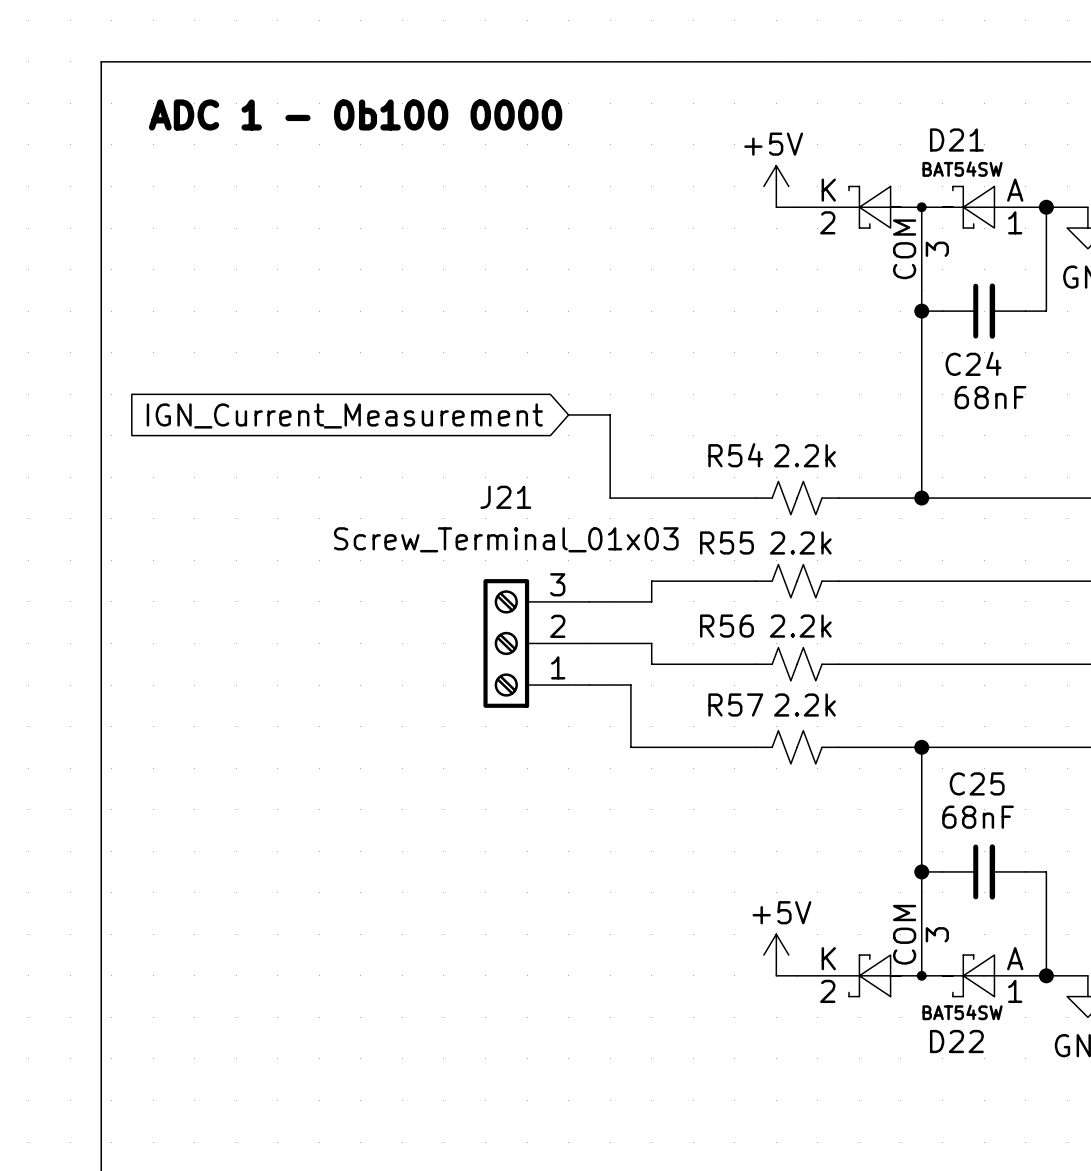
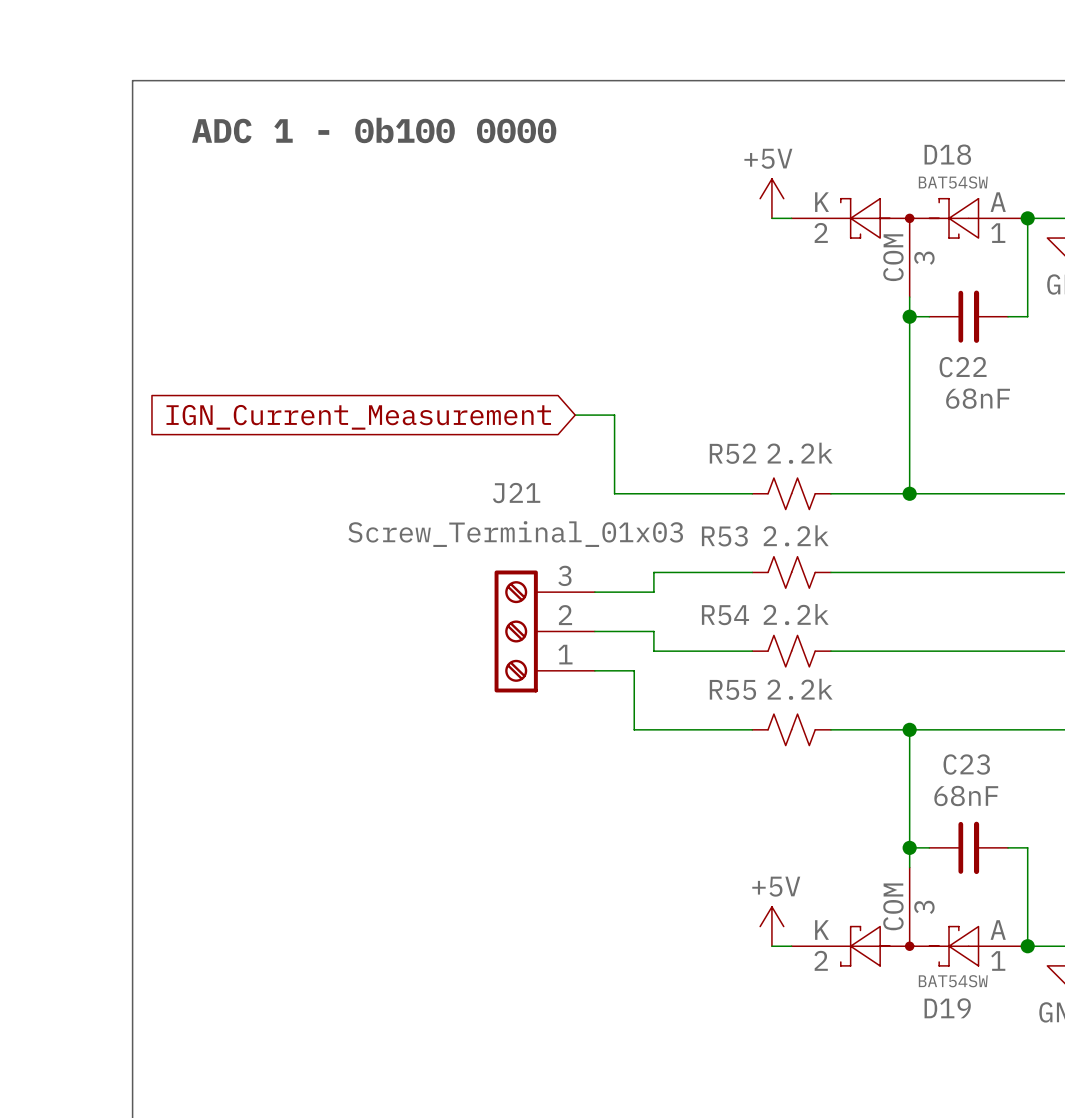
D21 name: D21 (956, 140) -> D18 (947, 154)
C24 name: C24 (973, 363) -> C22 (963, 367)
R54 name: R54 (735, 455) -> R52 (732, 453)
R55 name: R55 (726, 542) -> R53 (724, 536)
R56 name: R56 (726, 626) -> R54 (725, 615)
R57 name: R57 (735, 705) -> R55 (732, 689)
C25 name: C25 (977, 783) -> C23 (966, 764)
D22 name: D22 (956, 1041) -> D19 (947, 1008)

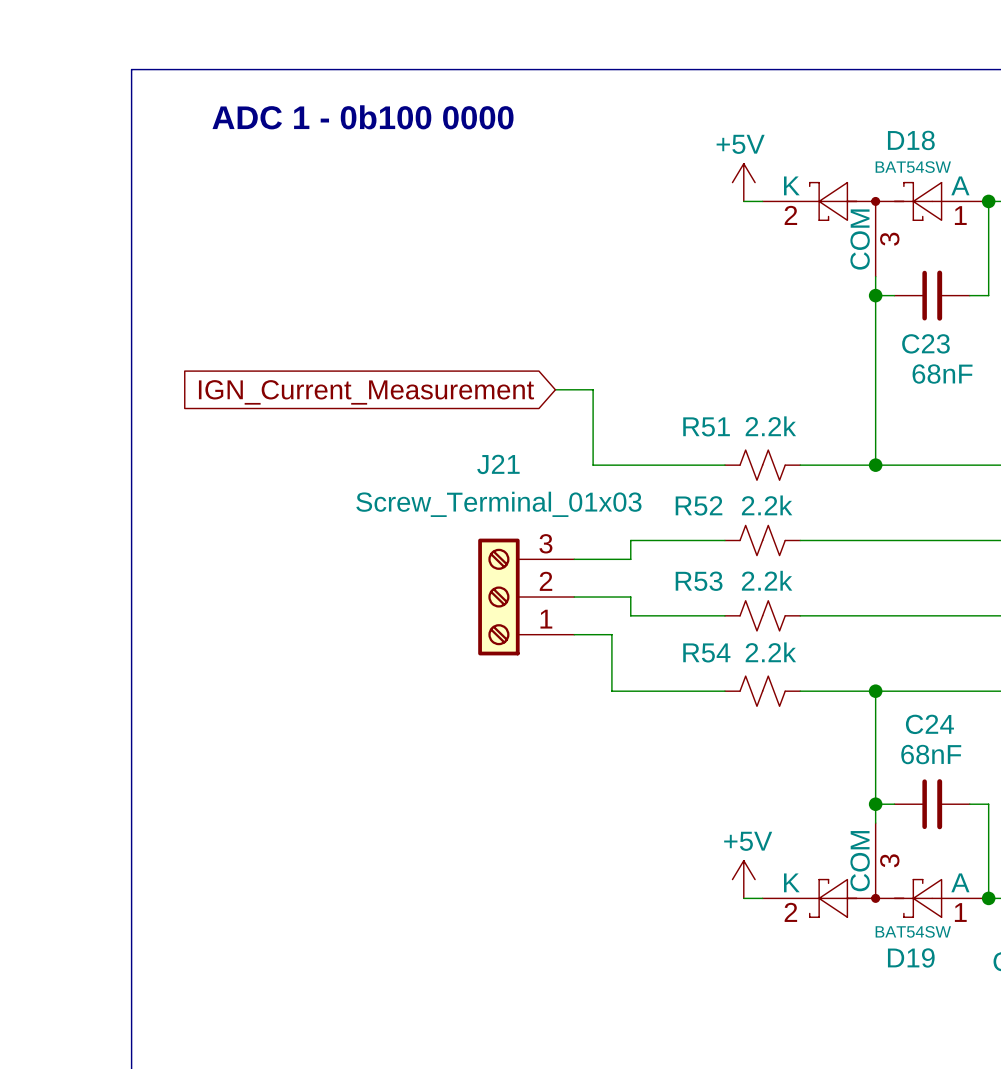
C22 name: C22 (963, 367) -> C23 (925, 343)
R52 name: R52 (732, 453) -> R51 (706, 426)
R53 name: R53 (724, 536) -> R52 (699, 505)
R54 name: R54 (725, 615) -> R53 (699, 581)
R55 name: R55 (732, 689) -> R54 (706, 652)
C23 name: C23 (966, 764) -> C24 (929, 724)

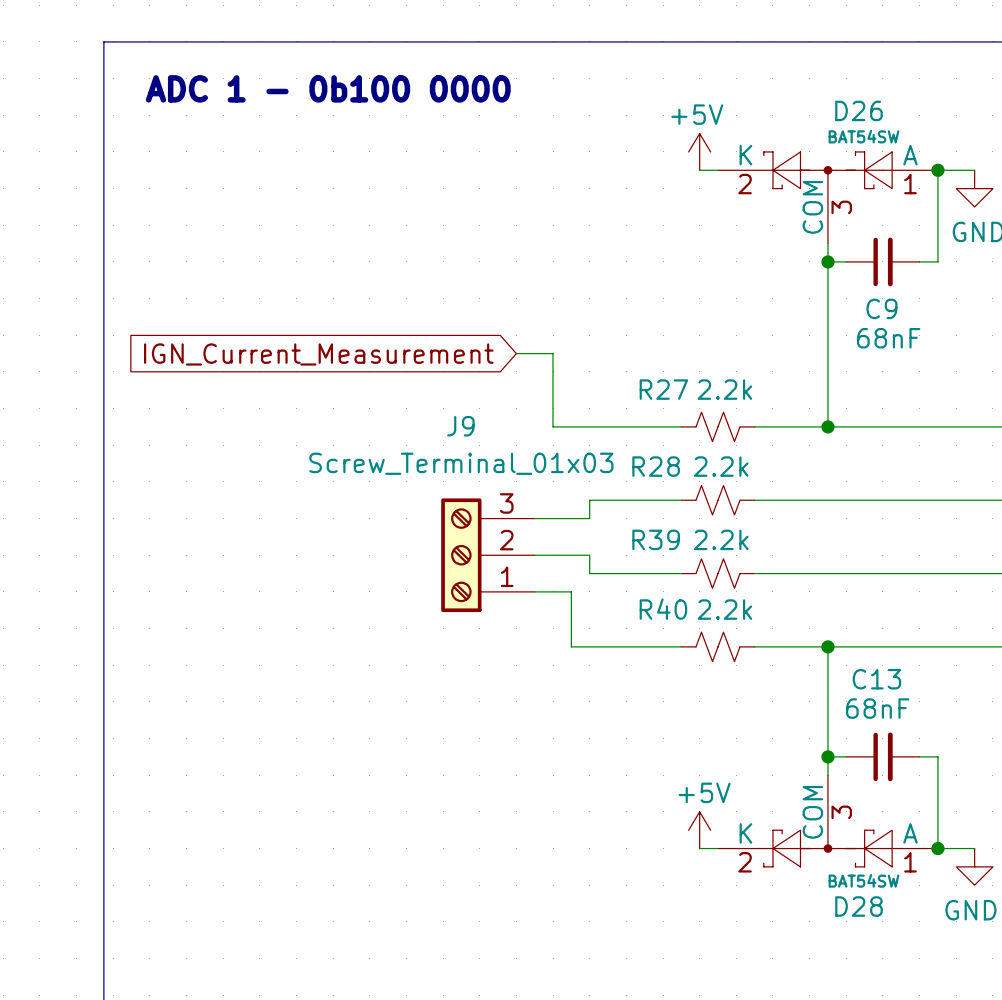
D18 name: D18 (911, 140) -> D26 (859, 110)
C23 name: C23 (925, 343) -> C9 (881, 308)
R51 name: R51 (706, 426) -> R27 (663, 389)
J21 name: J21 (498, 464) -> J9 (460, 426)
R52 name: R52 (699, 505) -> R28 (656, 466)
R53 name: R53 (699, 581) -> R39 (656, 539)
R54 name: R54 (706, 652) -> R40 (663, 609)
C24 name: C24 (929, 724) -> C13 (876, 679)
D19 name: D19 (911, 957) -> D28 (859, 906)

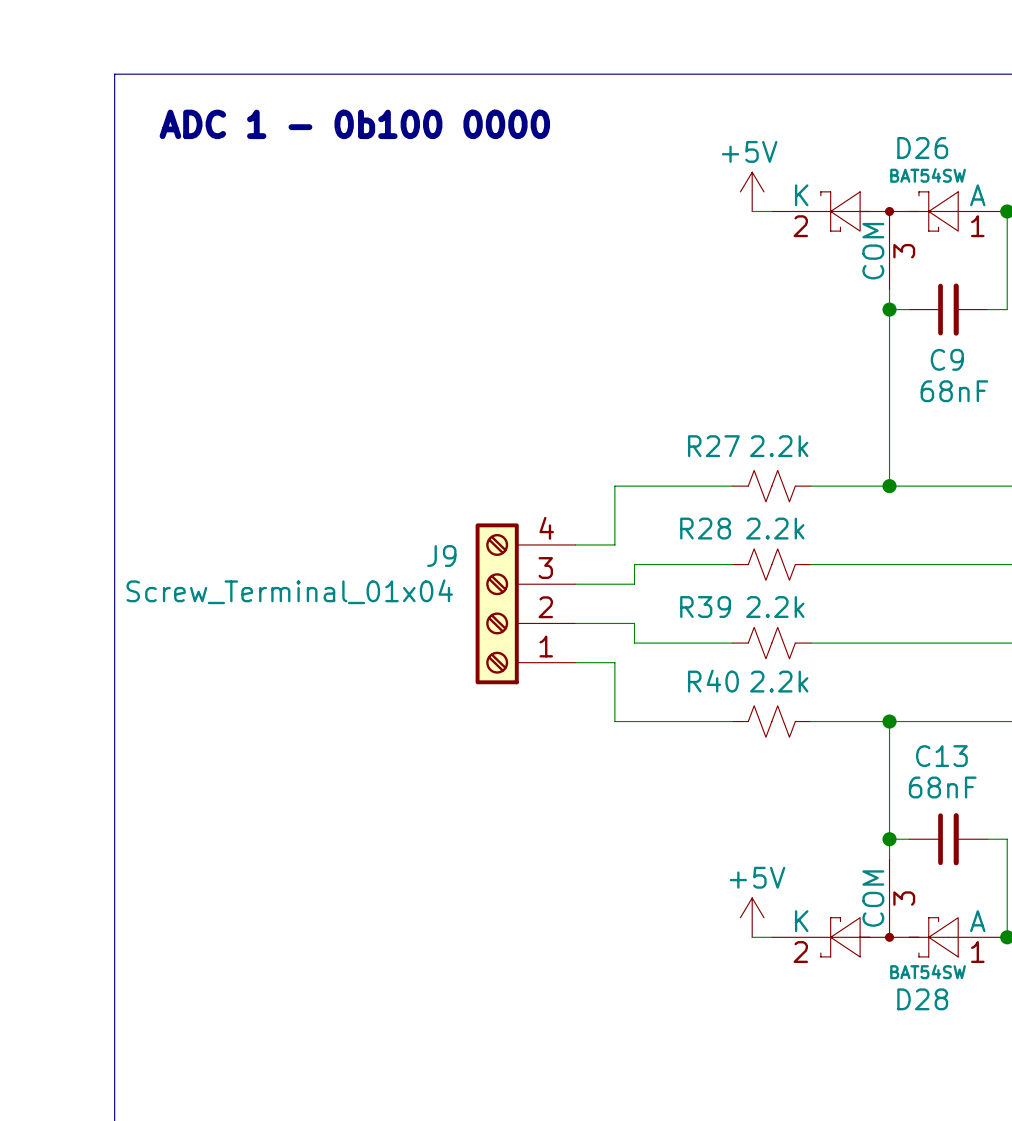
wire: (516, 353) (553, 353) (553, 426) (571, 426) -> (575, 544) (614, 544) (614, 486)
global label: IGN_Current_Measurement (318, 354) -> none
J9 name position: J9 (460, 426) -> J9 (441, 556)
J9 value: Screw_Terminal_01x03 (461, 463) -> Screw_Terminal_01x04 (289, 591)
J9 symbol: [441, 498, 535, 613] -> [475, 523, 576, 685]

